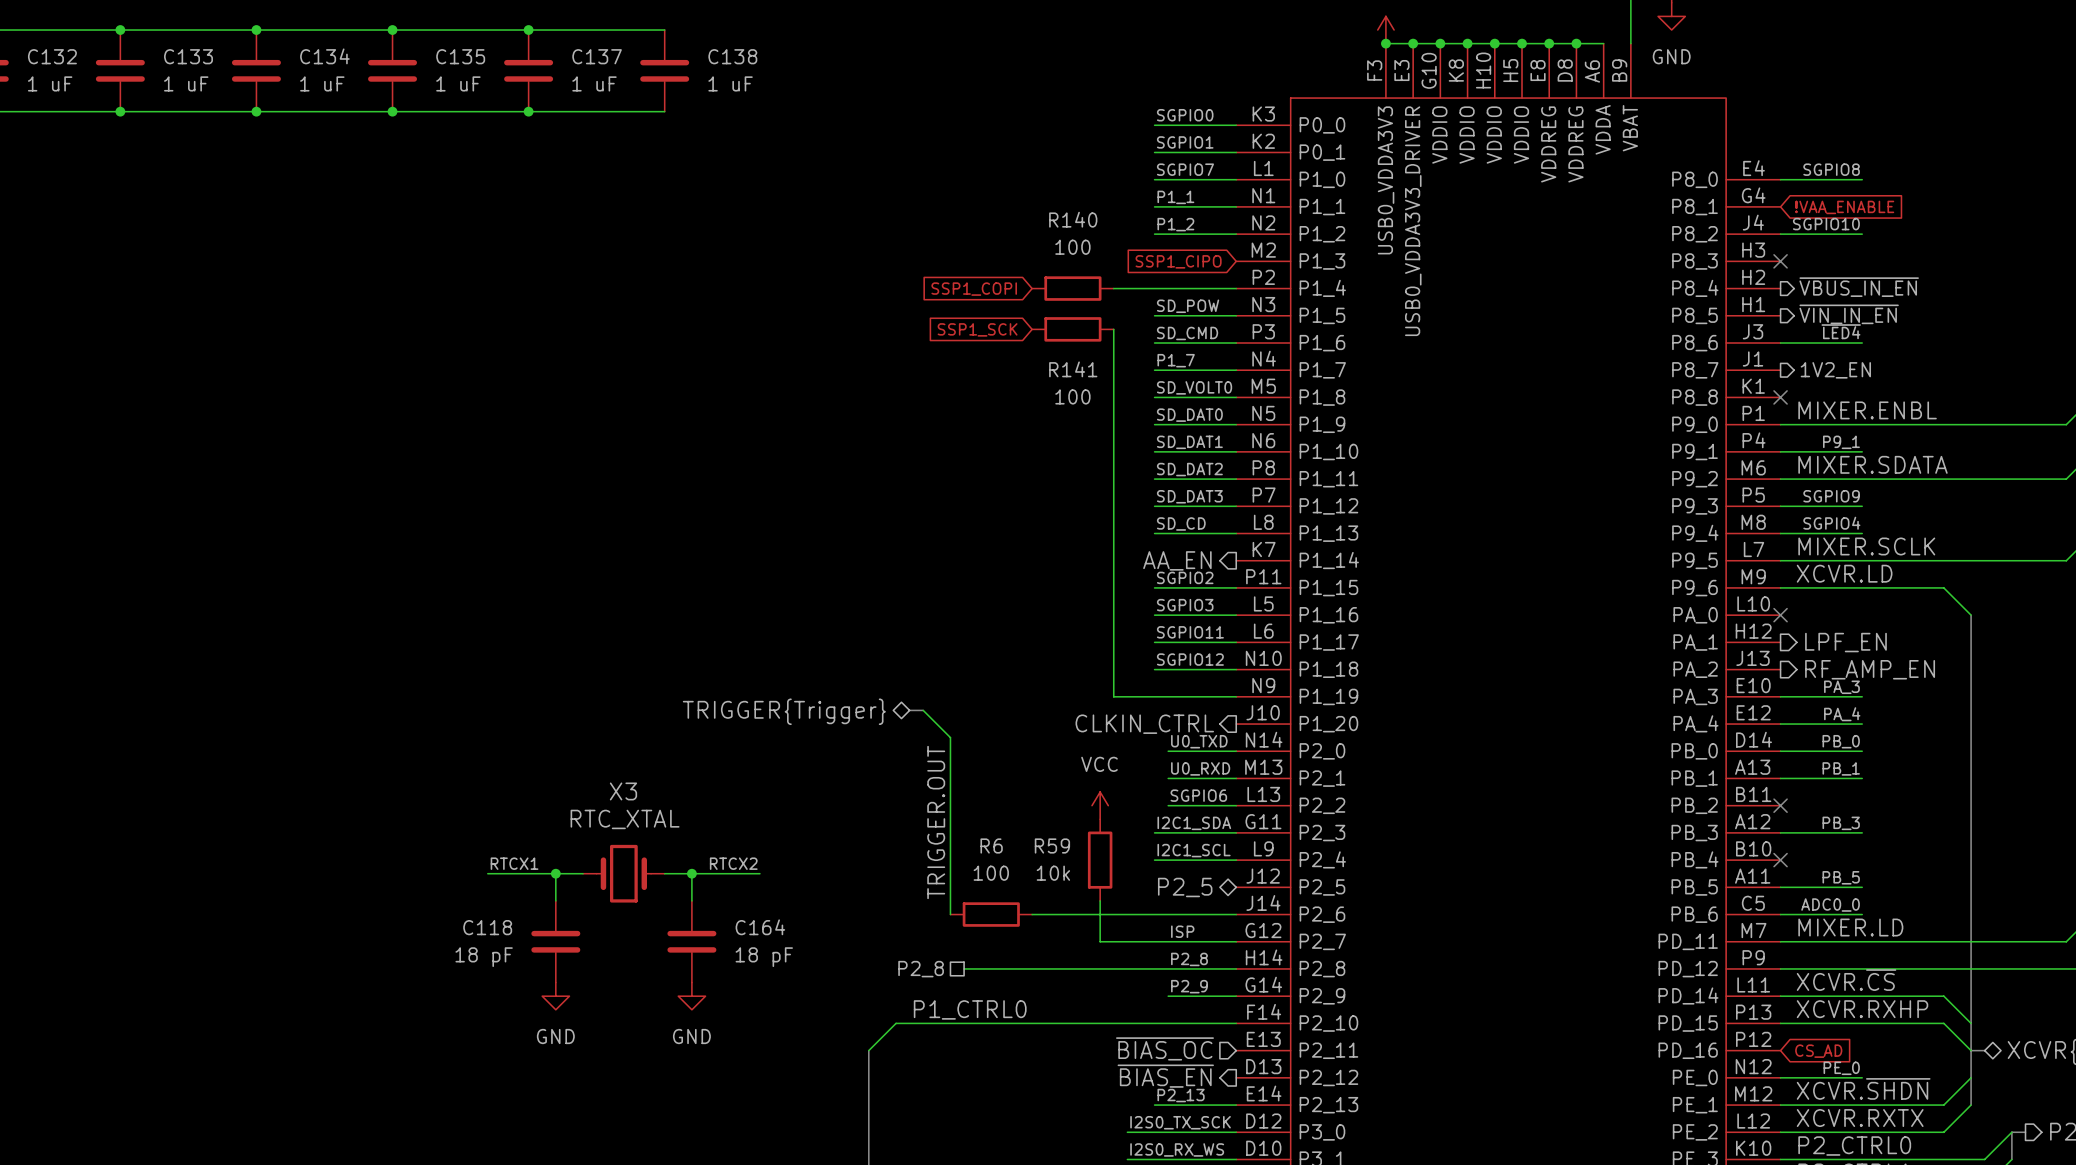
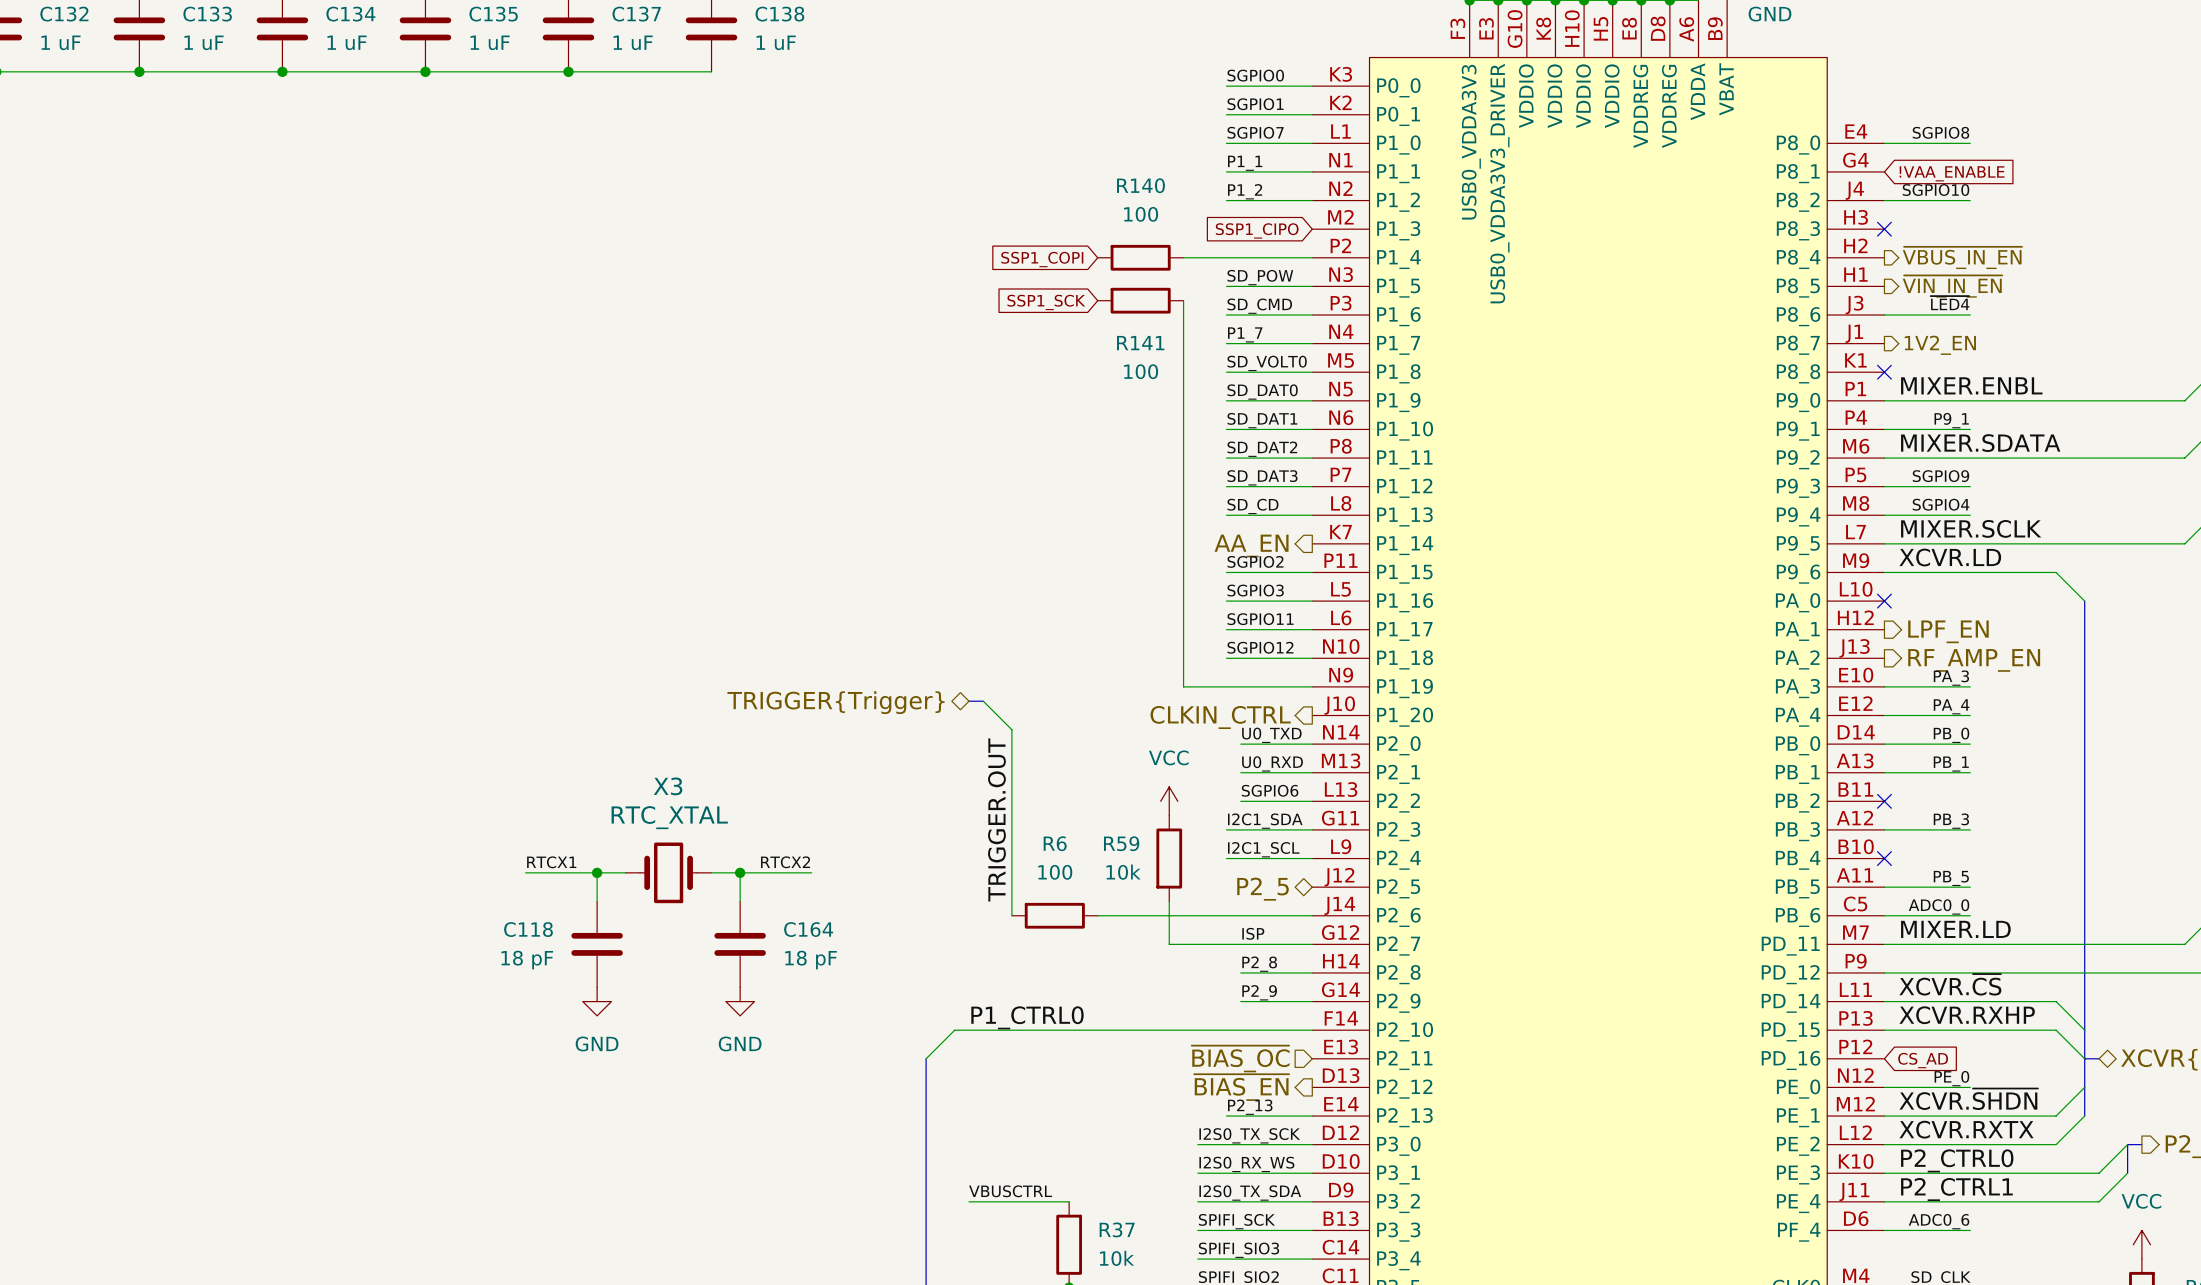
wire: (964, 968) (1168, 968) -> none
hierarchical label: P2_8 (921, 969) -> none

